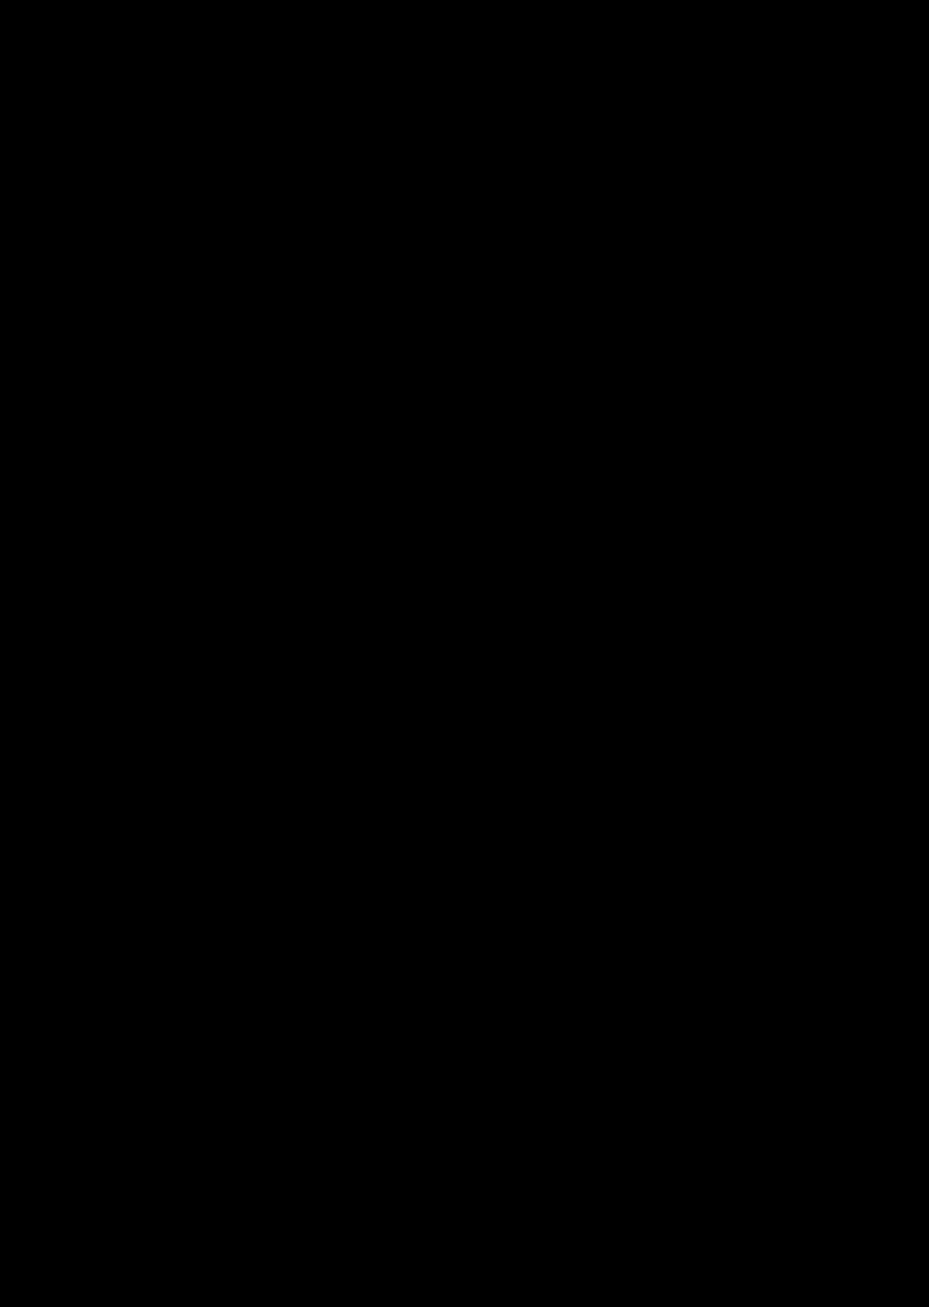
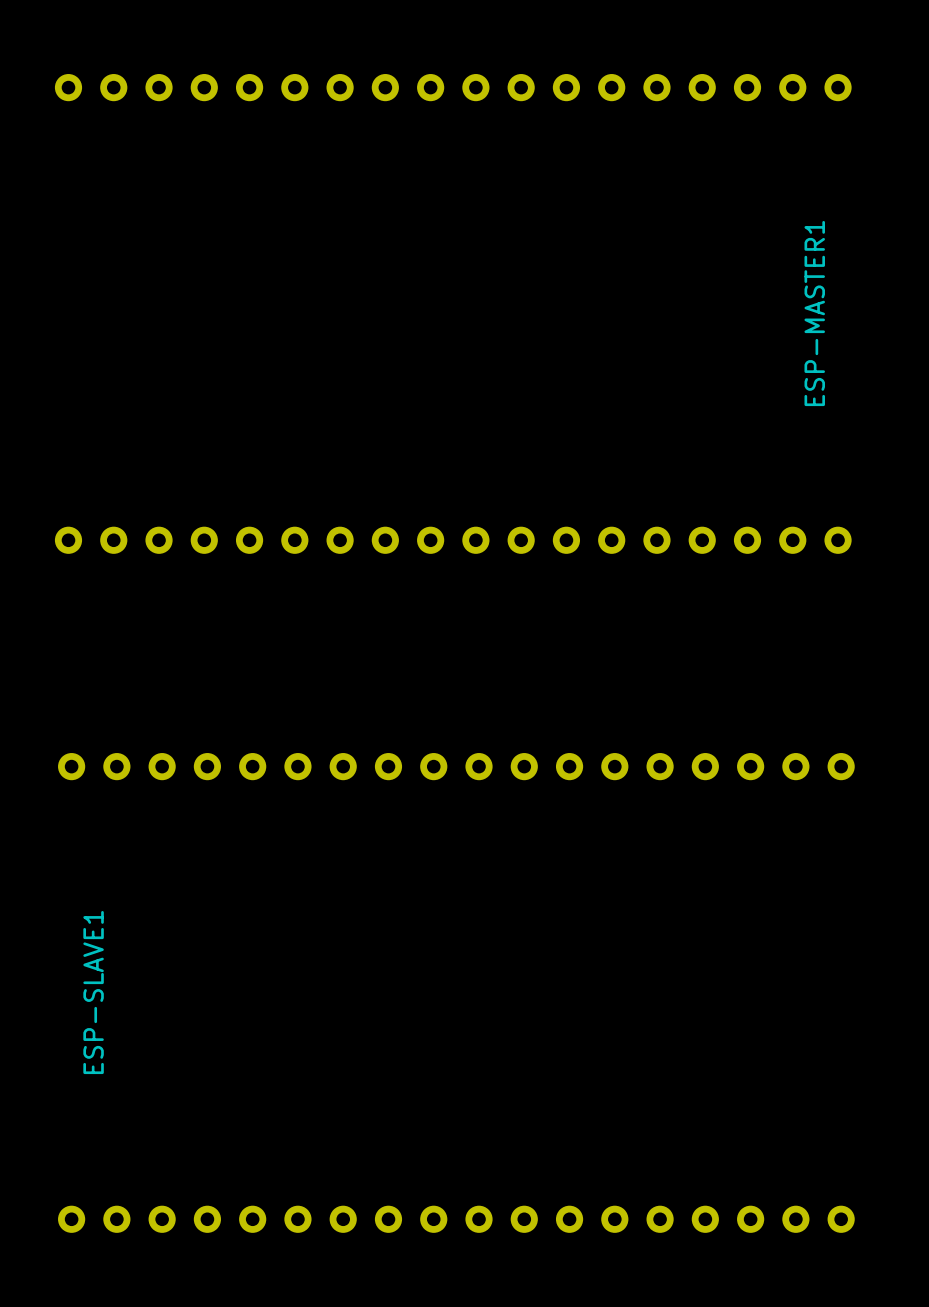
ESP-MASTER1: none -> (453, 313)
ESP-SLAVE1: none -> (456, 992)

